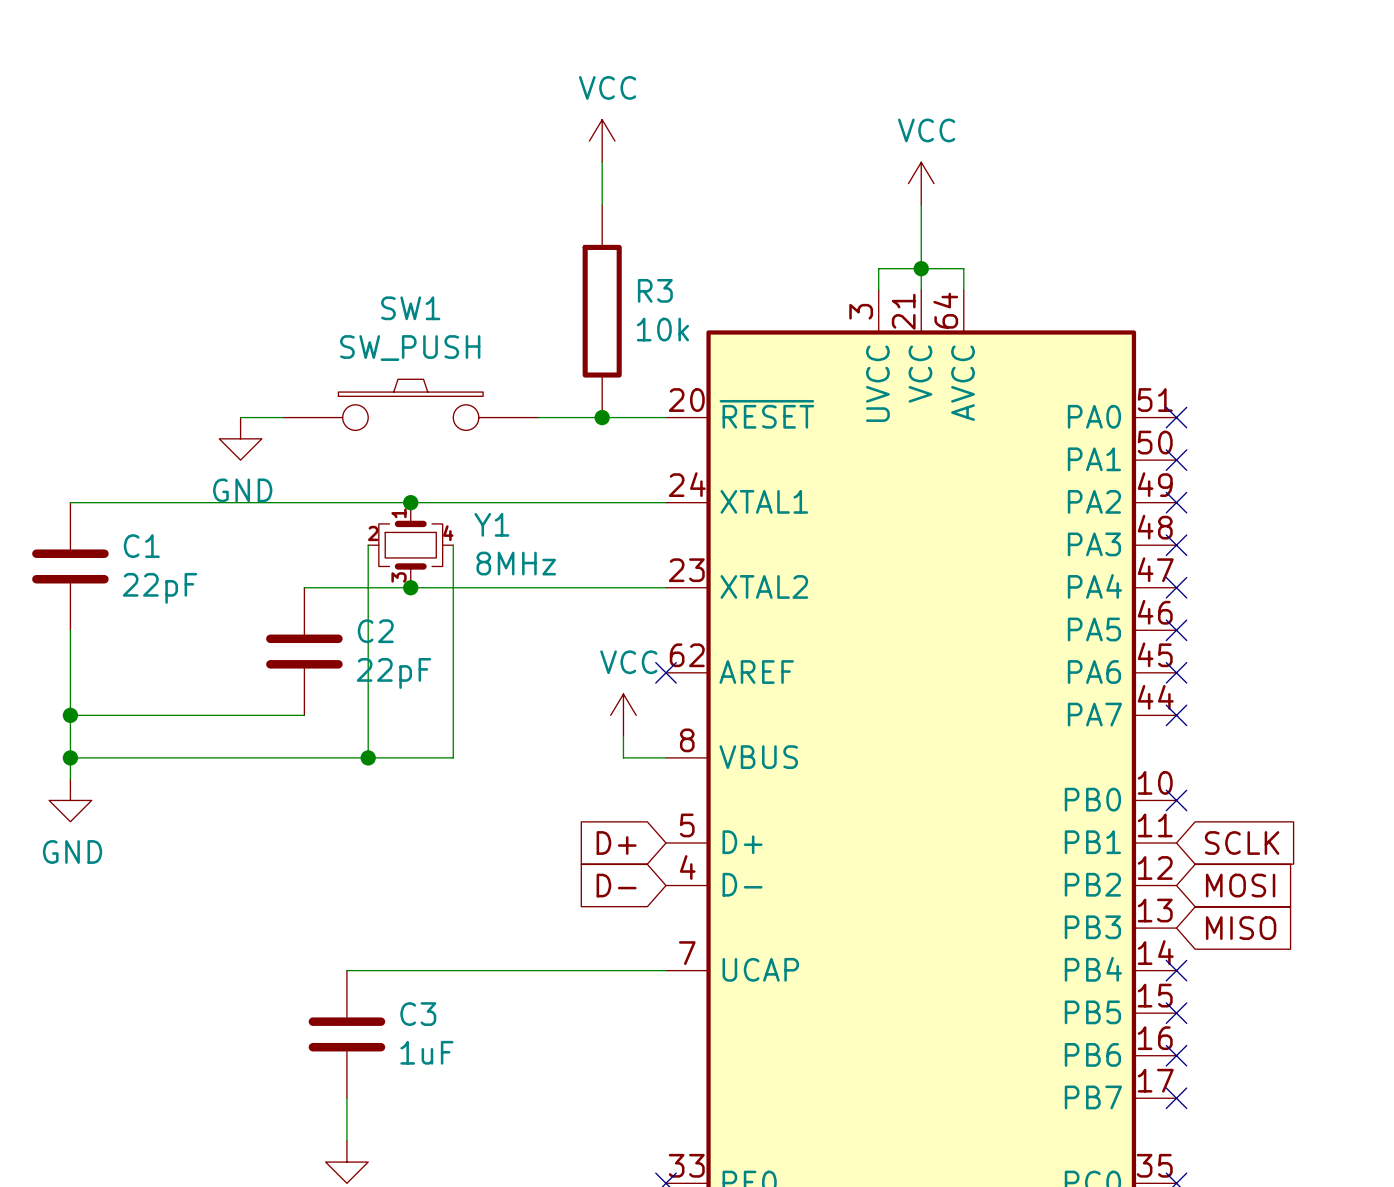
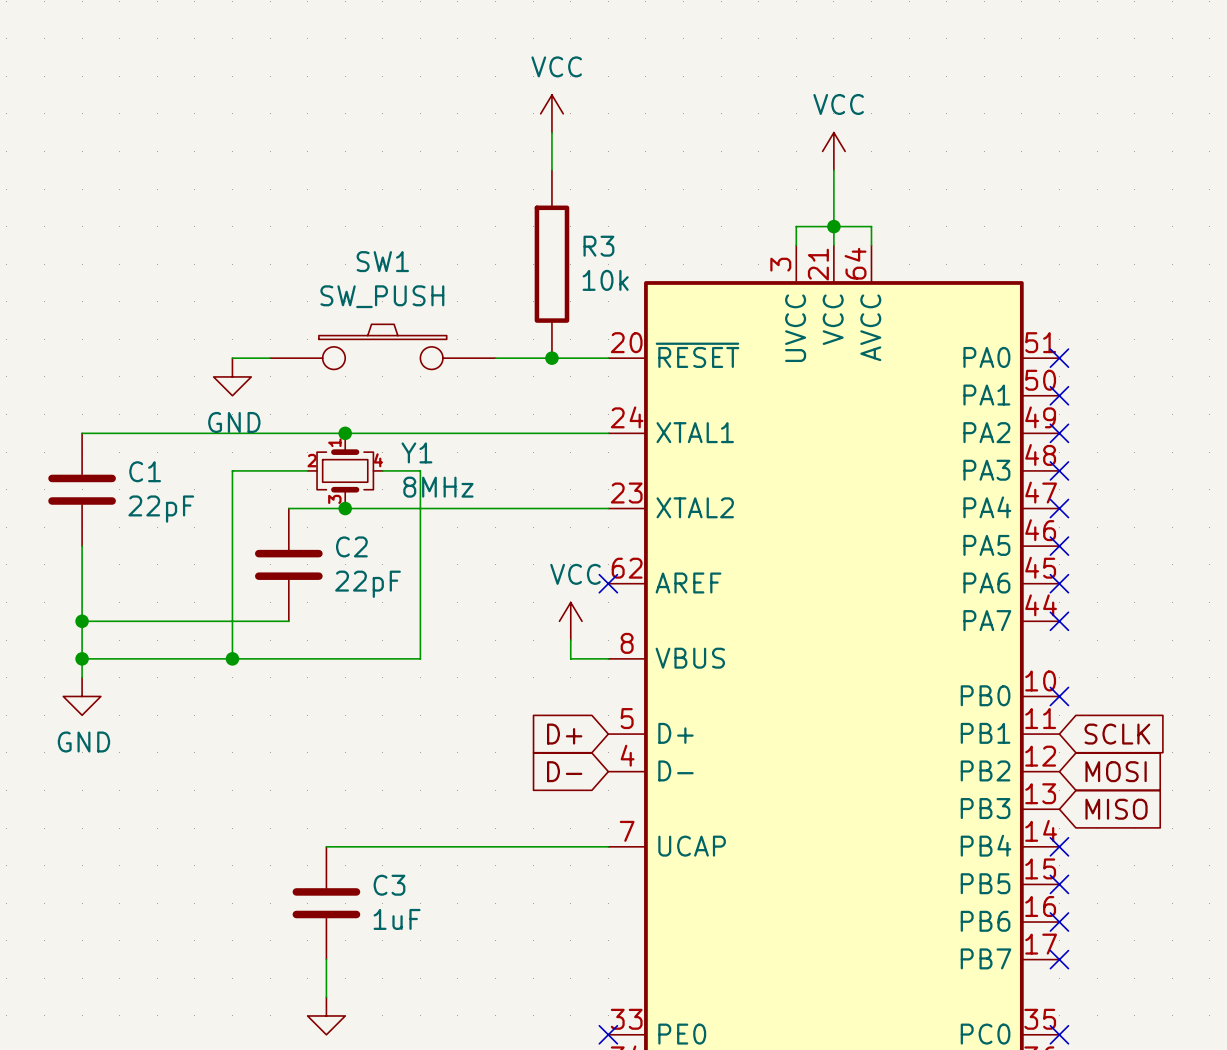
junction position: (410, 502) -> (345, 433)
wire: none -> (307, 470) (232, 470) (232, 658)
wire: (368, 545) (368, 757) -> none
wire: none -> (382, 470) (420, 470)
Y1 position: (410, 545) -> (345, 470)
junction position: (410, 587) -> (345, 508)
junction: none -> (232, 658)
junction: (368, 757) -> none

